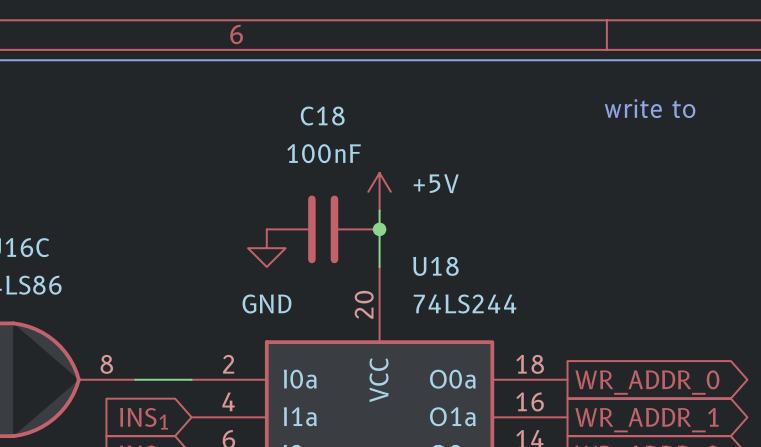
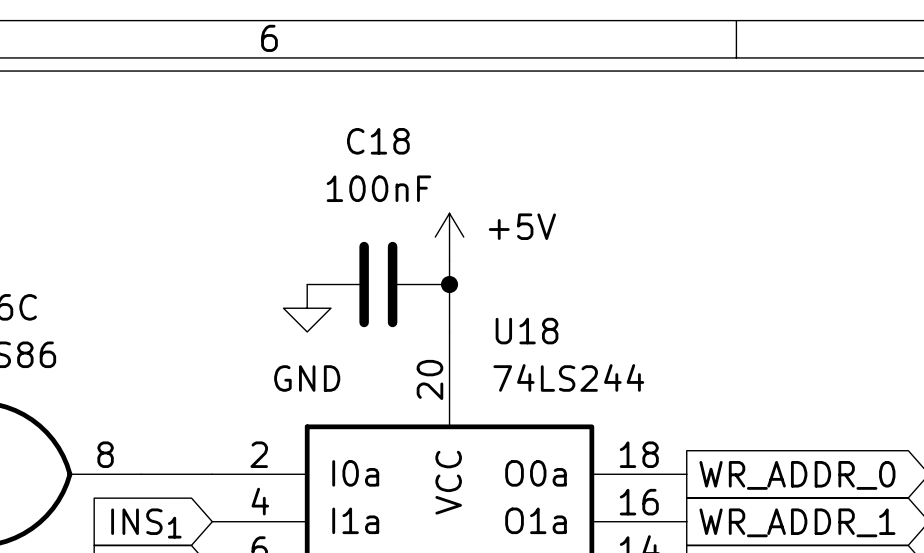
text: write to (650, 108) -> none

